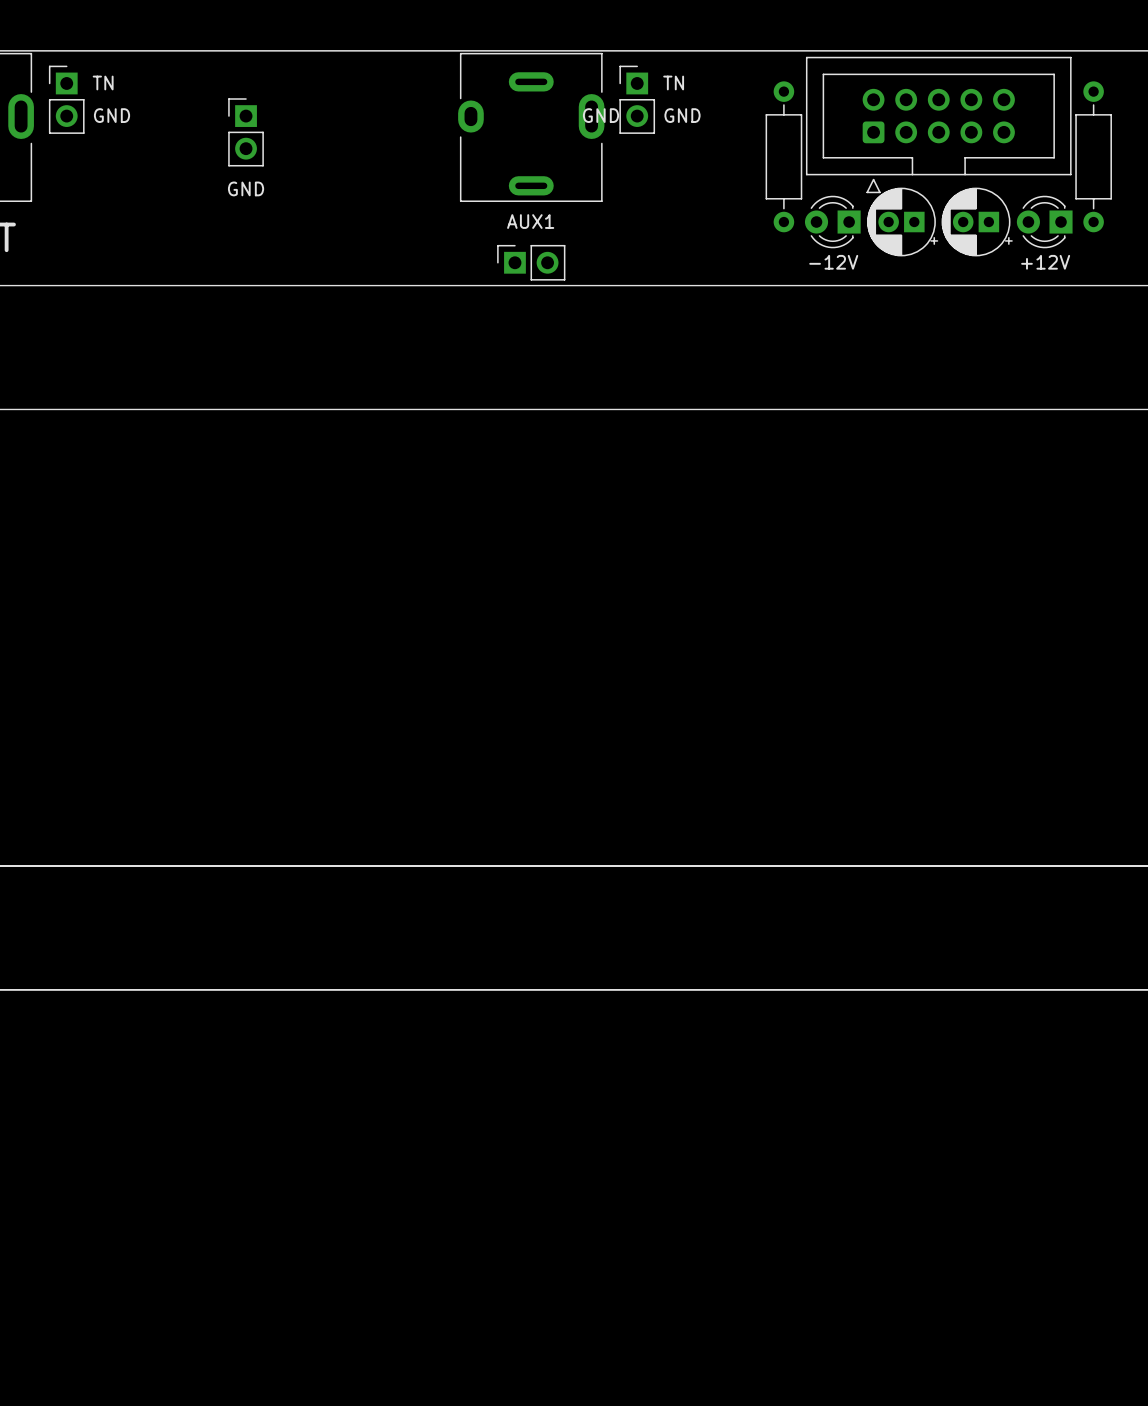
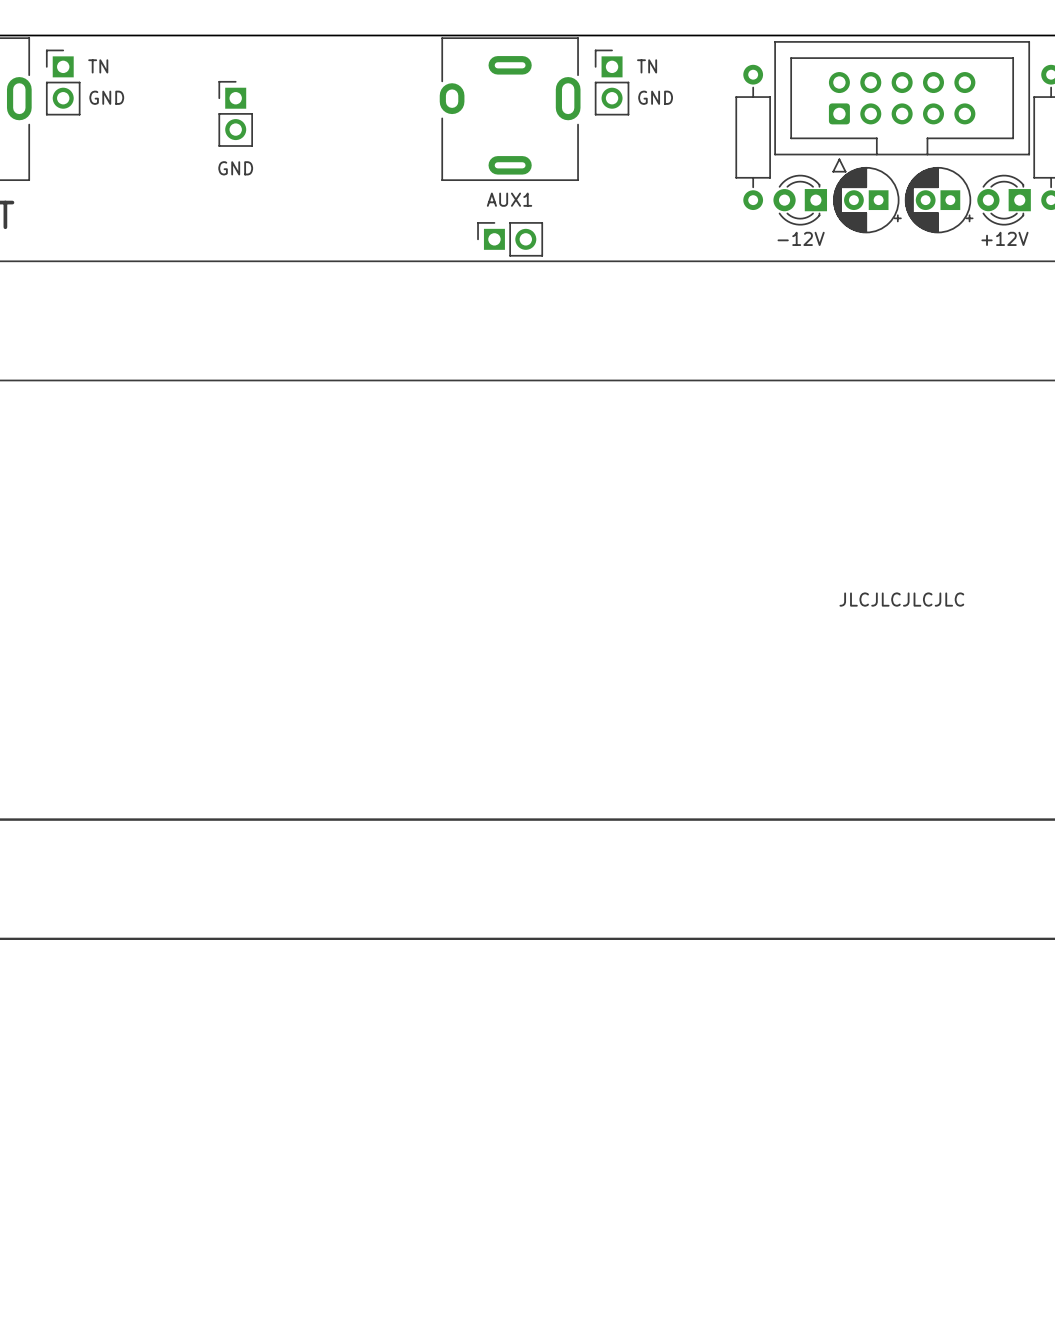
text: GND (601, 115) -> none
text: none -> JLCJLCJLCJLC (901, 599)

